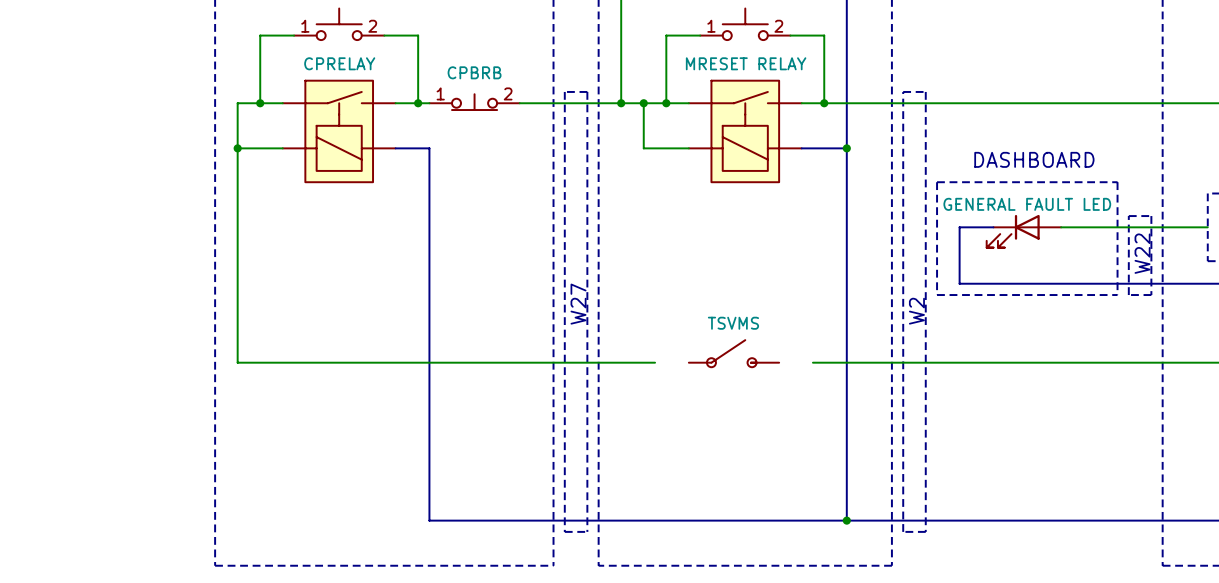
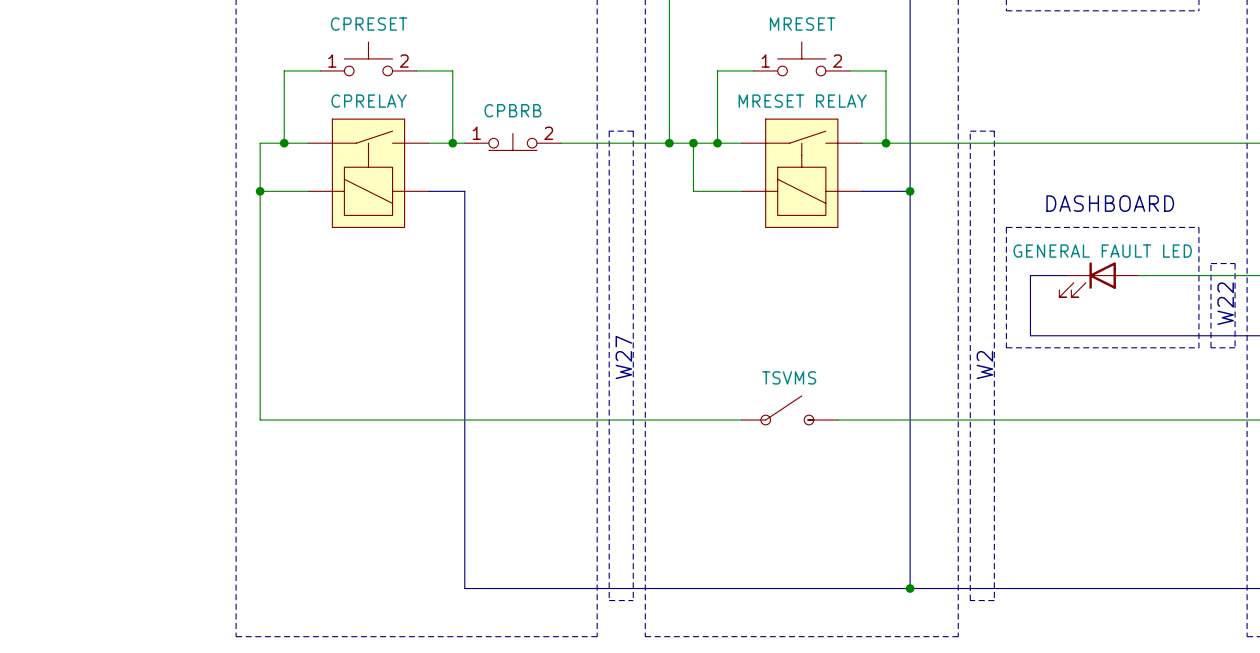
wire: none -> (705, 420) (741, 420)
wire: none -> (837, 420) (873, 420)

